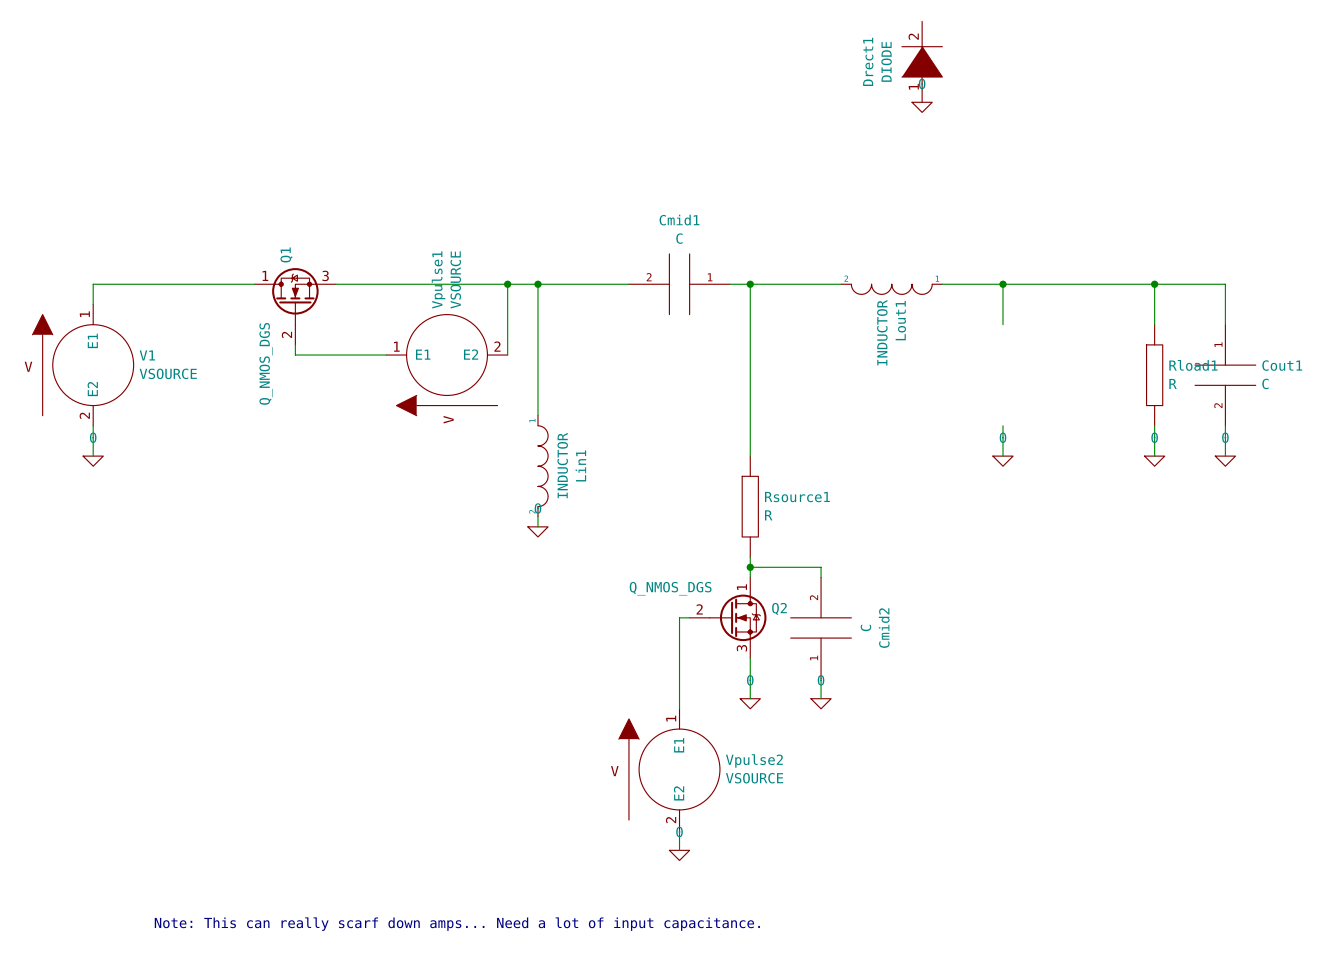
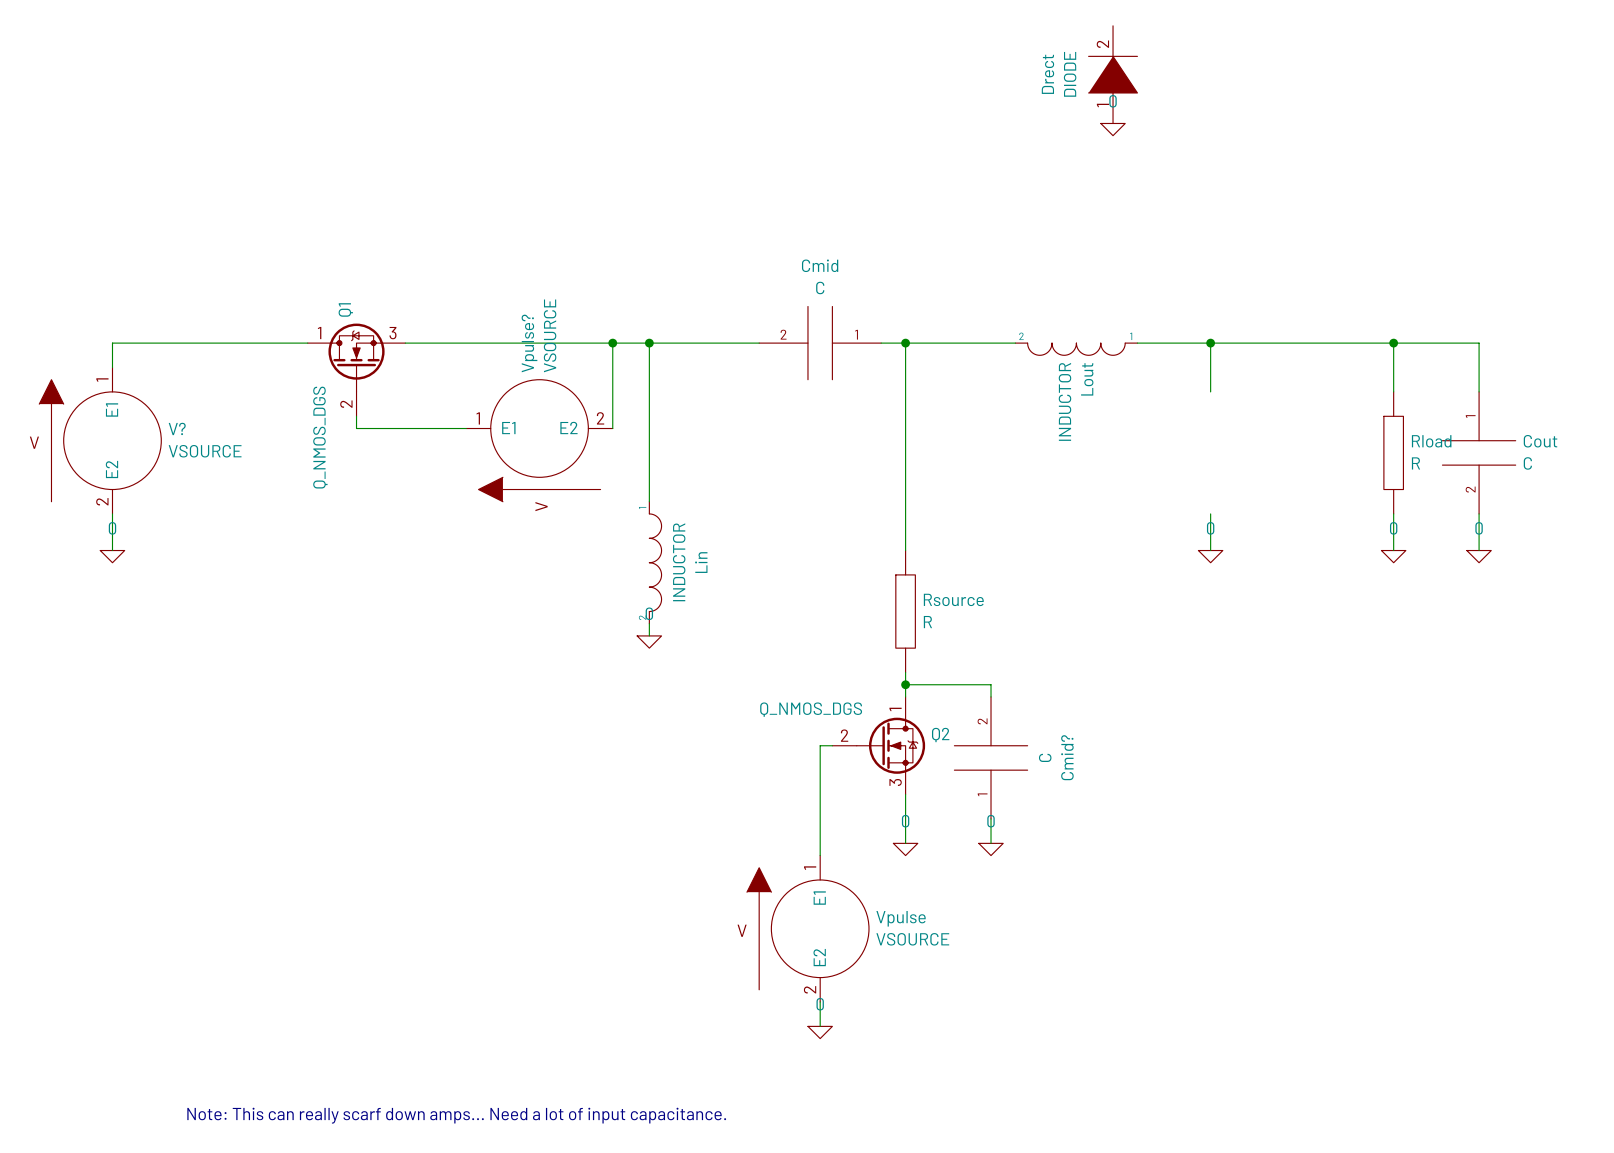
Drect1 name: Drect1 (868, 61) -> Drect (1047, 74)
Cmid1 name: Cmid1 (679, 220) -> Cmid (820, 265)
Vpulse1 name: Vpulse1 (438, 279) -> Vpulse? (529, 343)
Lout1 name: Lout1 (900, 320) -> Lout (1087, 379)
V1 name: V1 (147, 355) -> V? (177, 428)
Rload1 name: Rload1 (1193, 365) -> Rload (1431, 441)
Cout1 name: Cout1 (1282, 365) -> Cout (1540, 441)
Lin1 name: Lin1 (580, 465) -> Lin (701, 562)
Rsource1 name: Rsource1 (797, 497) -> Rsource (953, 599)
Cmid2 name: Cmid2 (884, 628) -> Cmid? (1067, 757)
Vpulse2 name: Vpulse2 (754, 761) -> Vpulse (901, 918)

